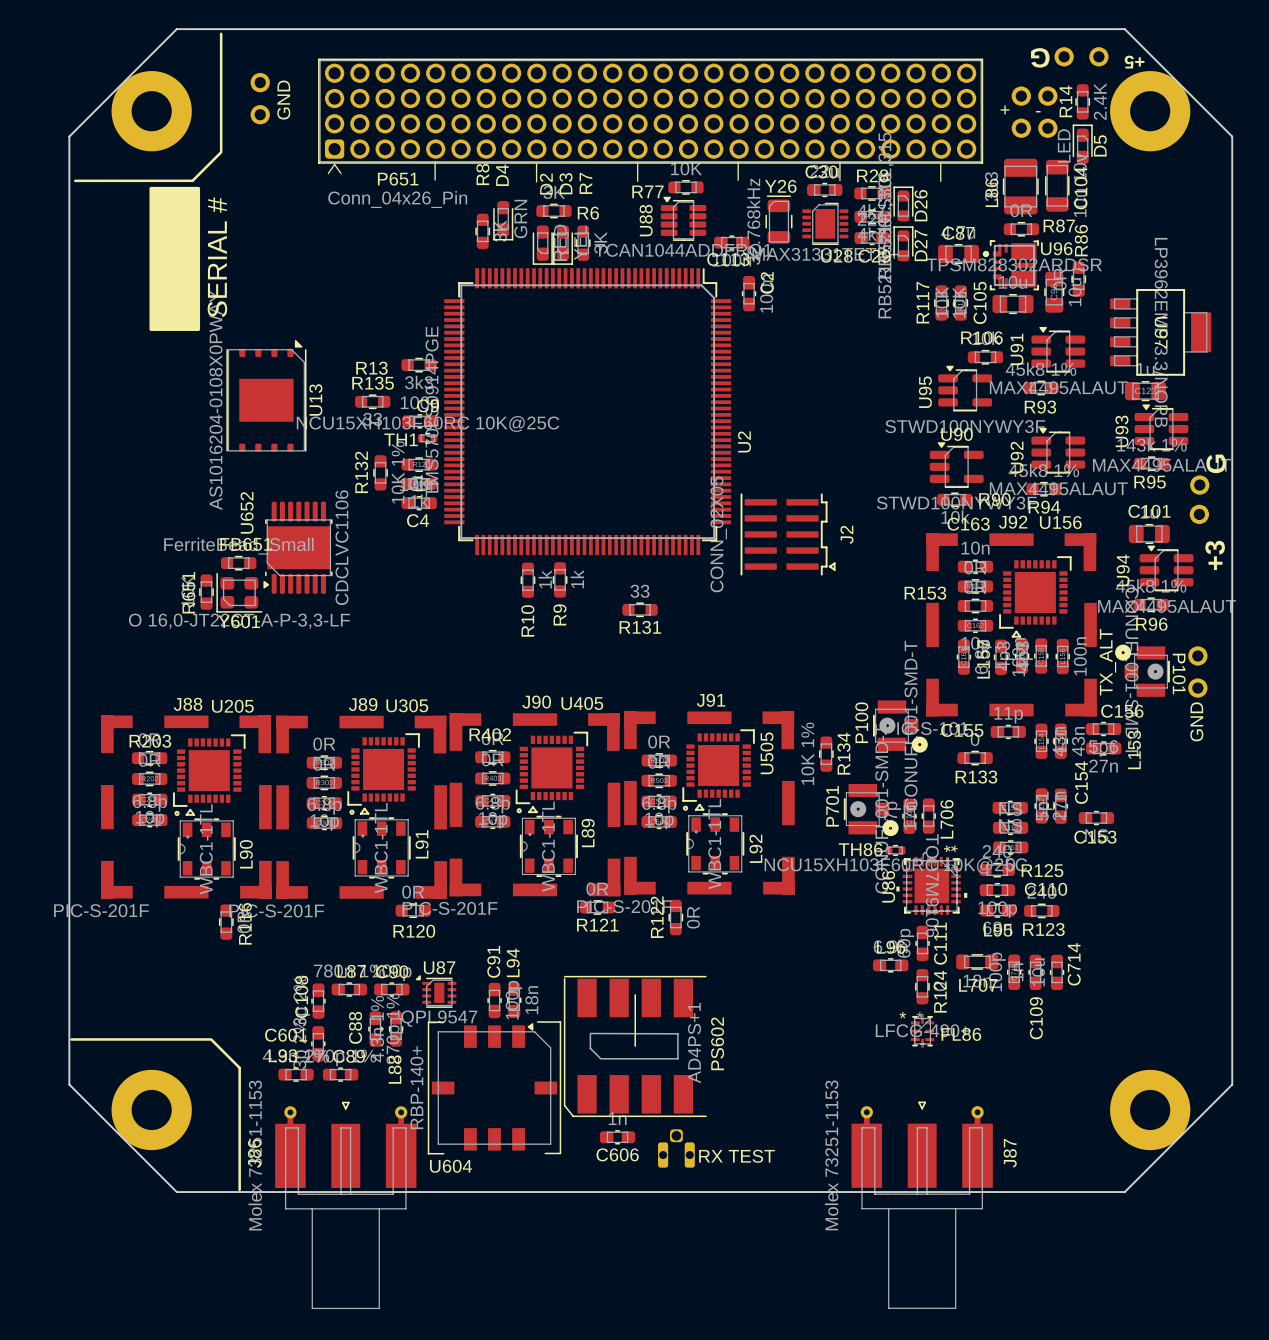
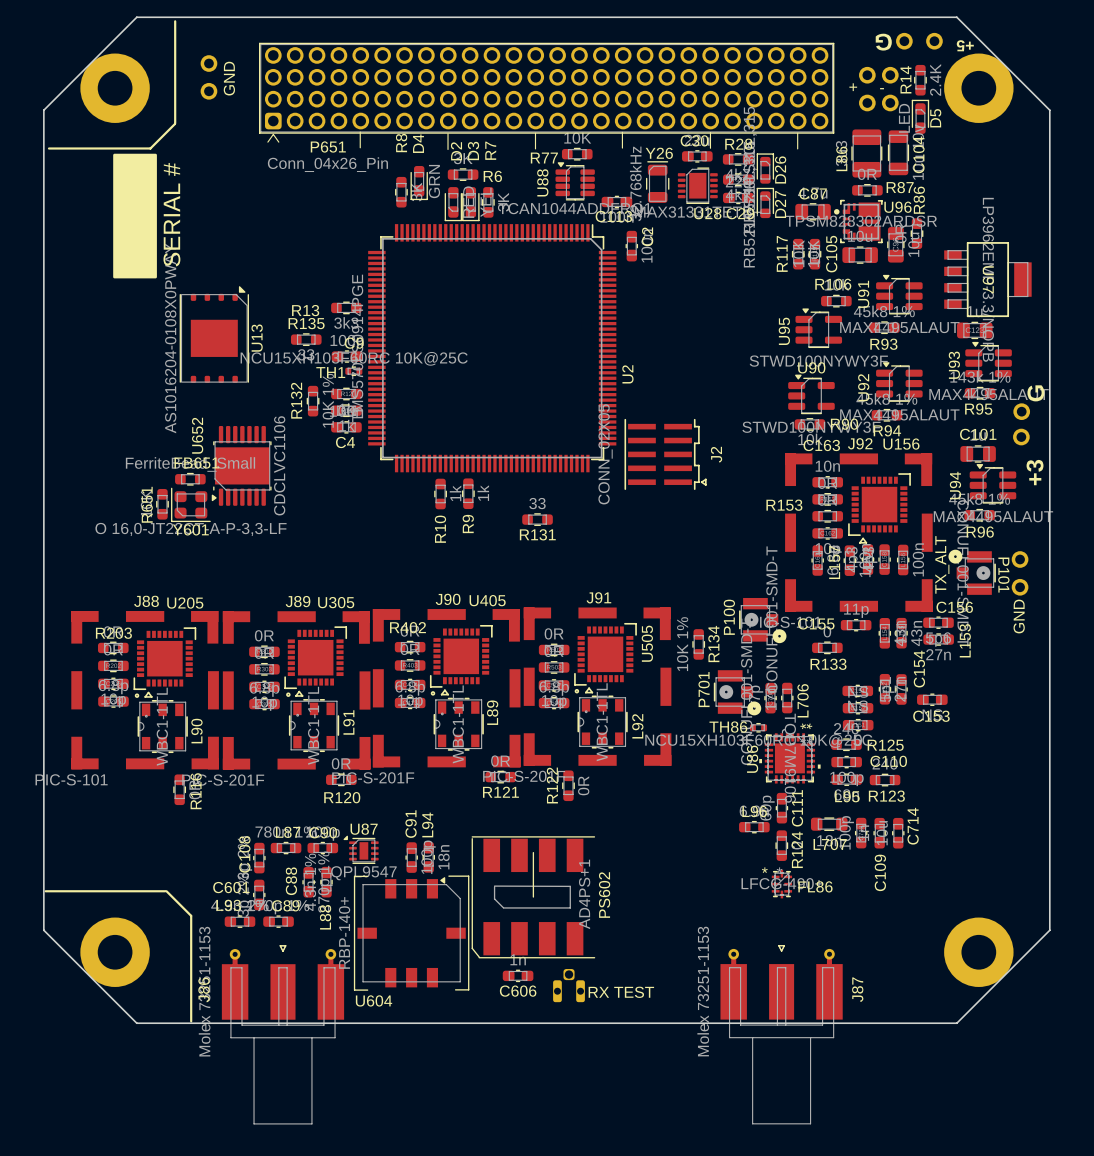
J88 value: PIC-S-201F (101, 910) -> PIC-S-101 (71, 779)

